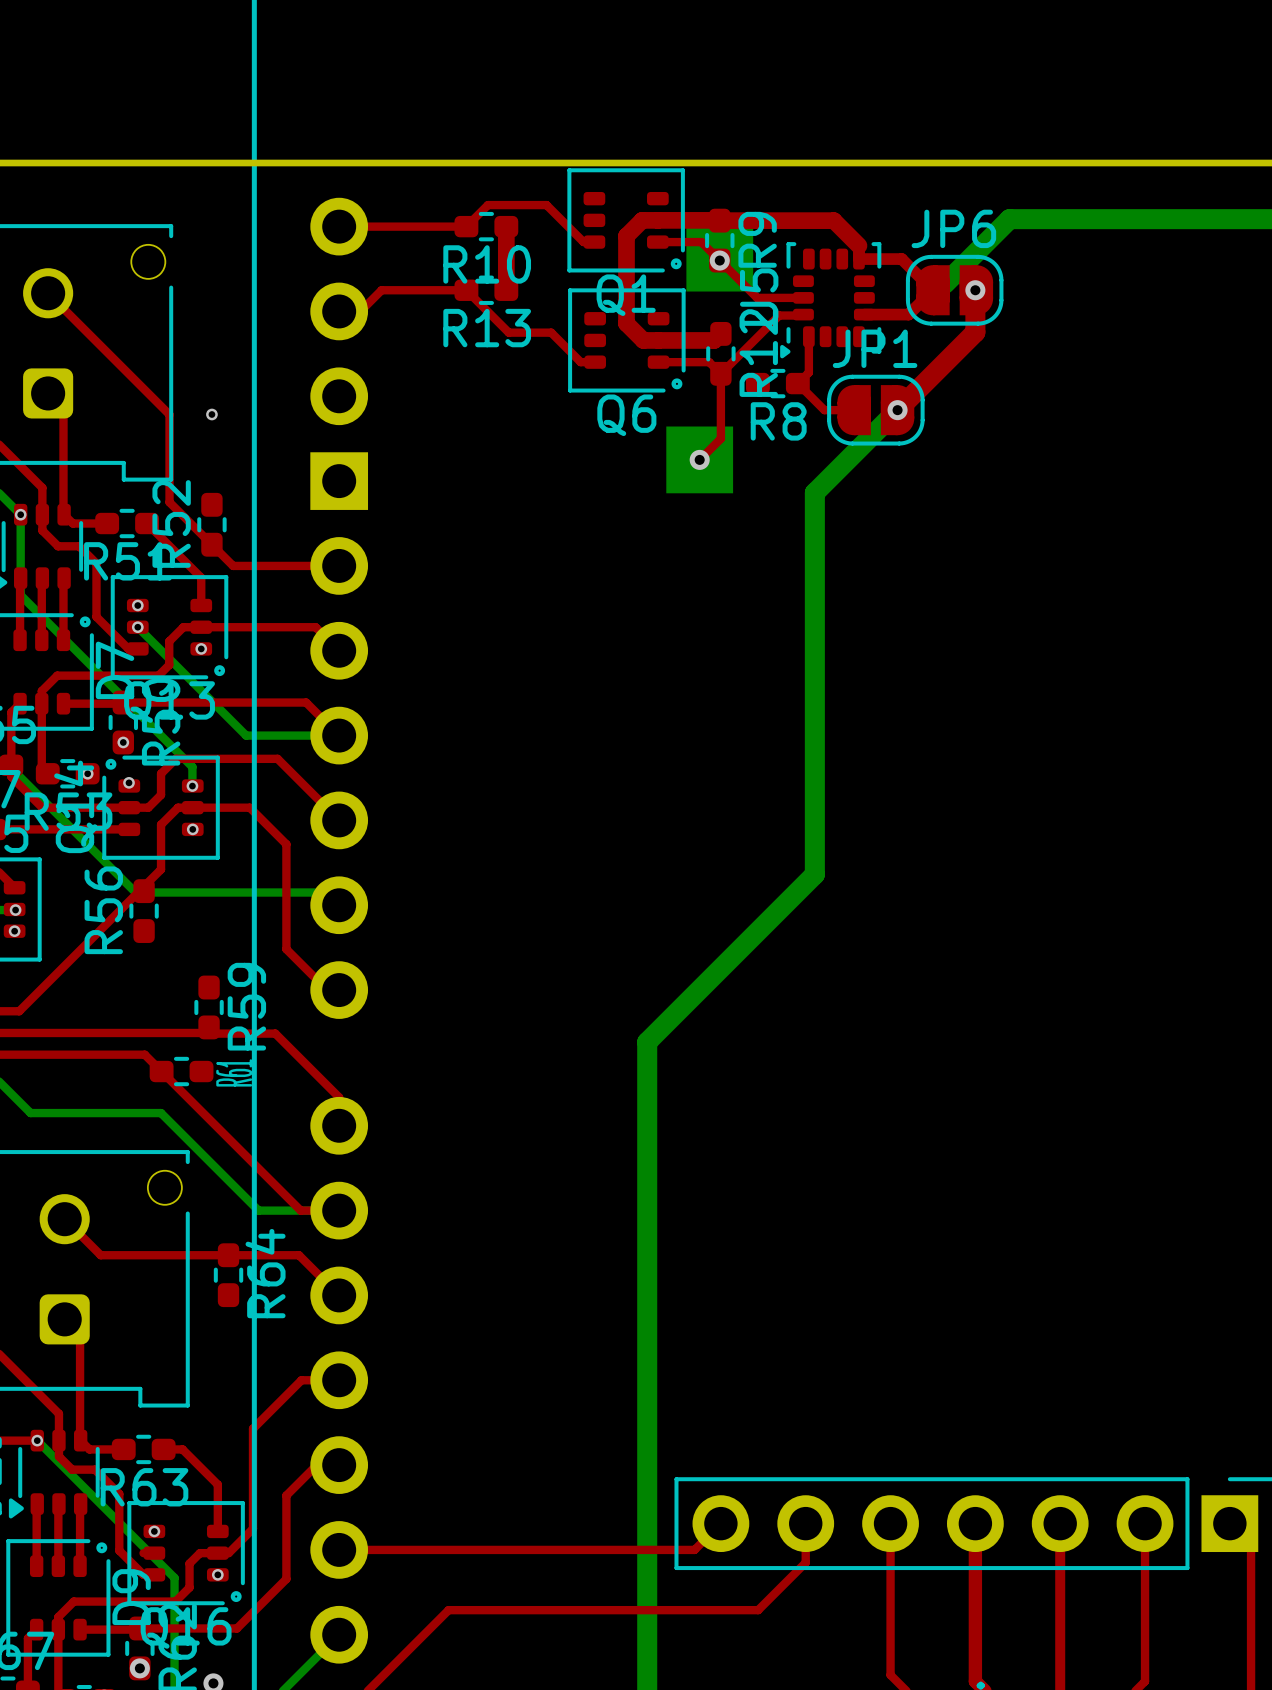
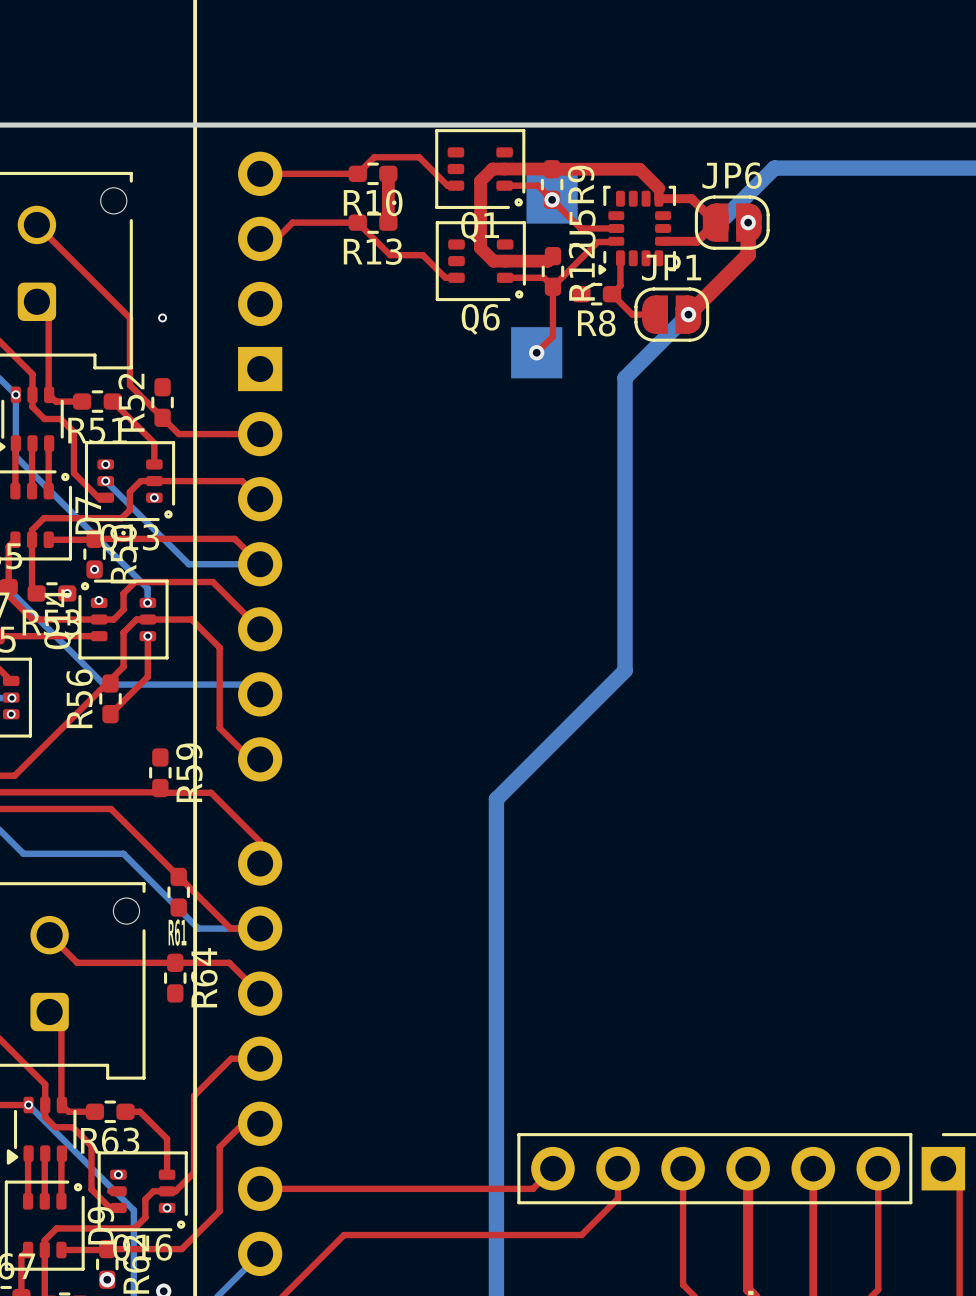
top track: none -> (147, 636) (147, 676) (110, 714)
R61 rotation: 0° (181, 1071) -> 90° clockwise (178, 892)
R61 position: (181, 1071) -> (178, 892)

